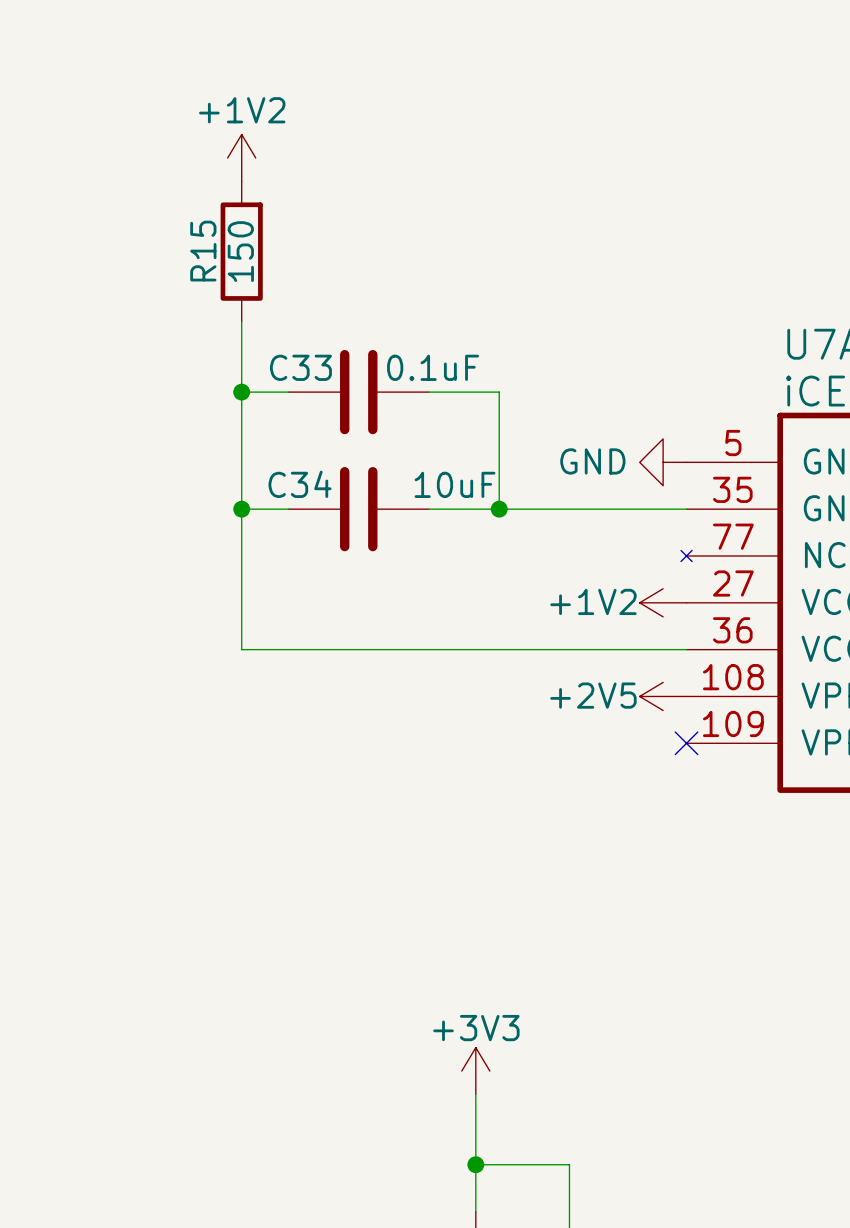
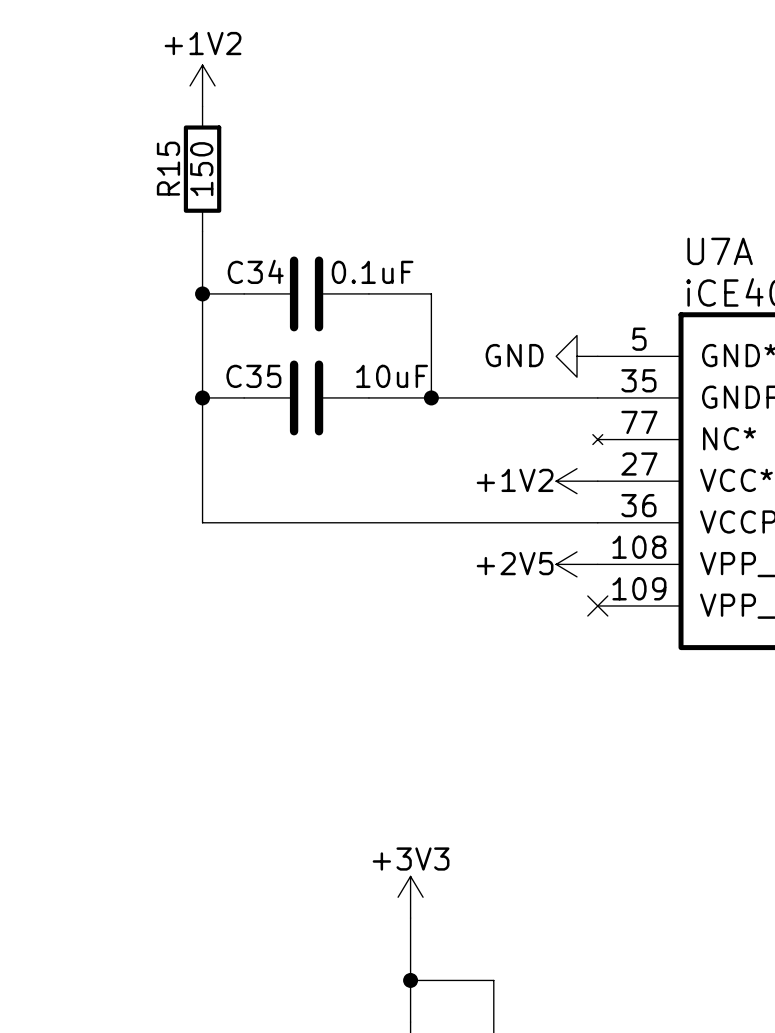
C33 name: C33 (300, 367) -> C34 (255, 271)
C34 name: C34 (300, 484) -> C35 (253, 376)

